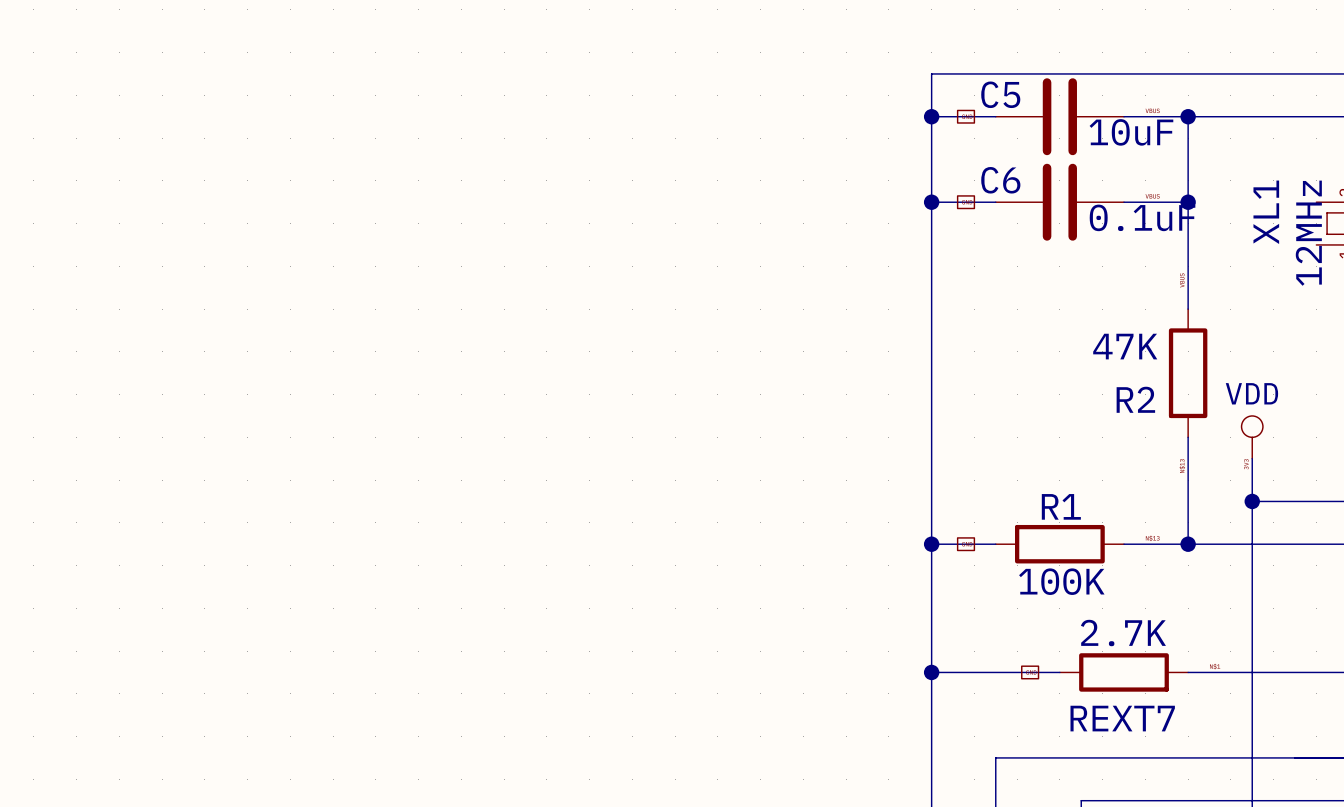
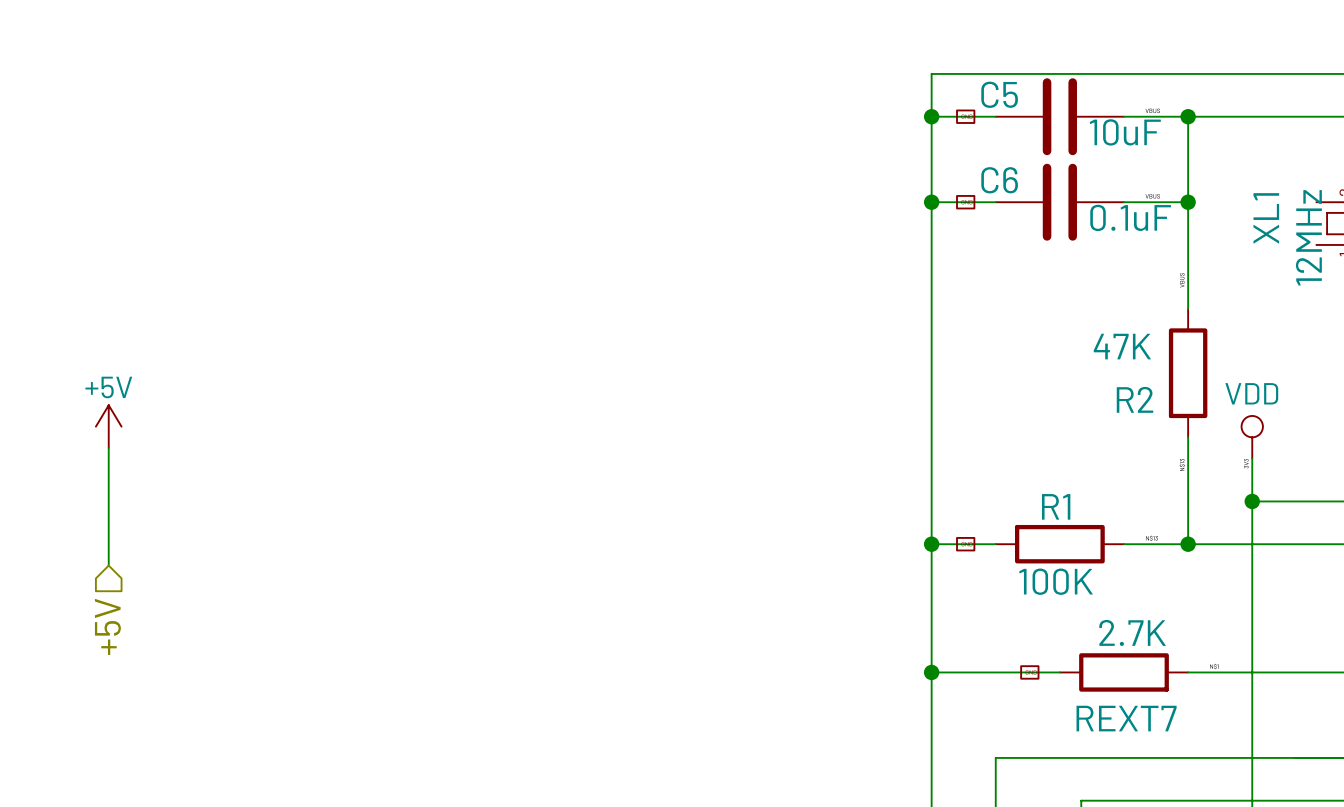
power symbol: none -> +5V (108, 426)
wire: none -> (108, 448) (108, 565)
hierarchical label: none -> +5V (107, 626)

